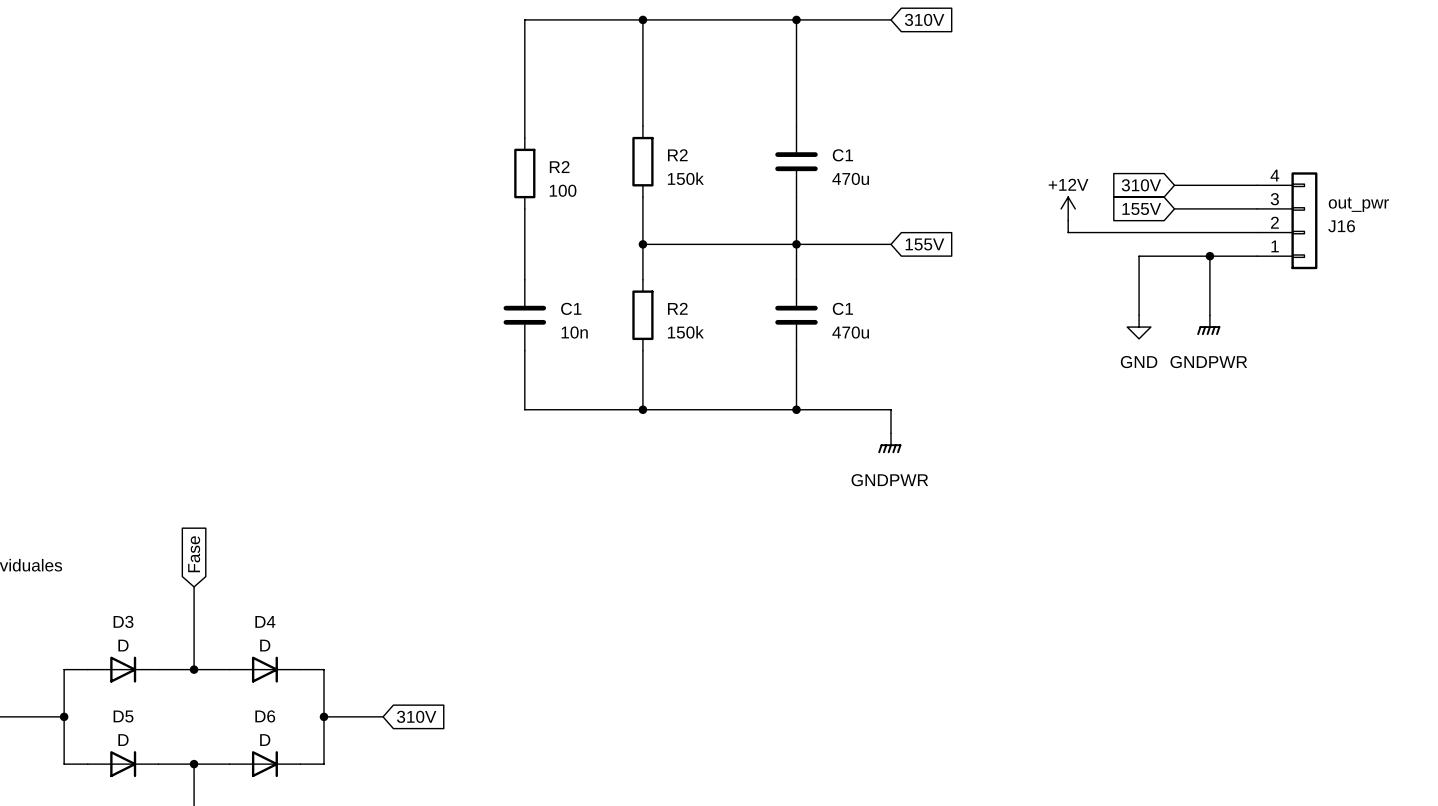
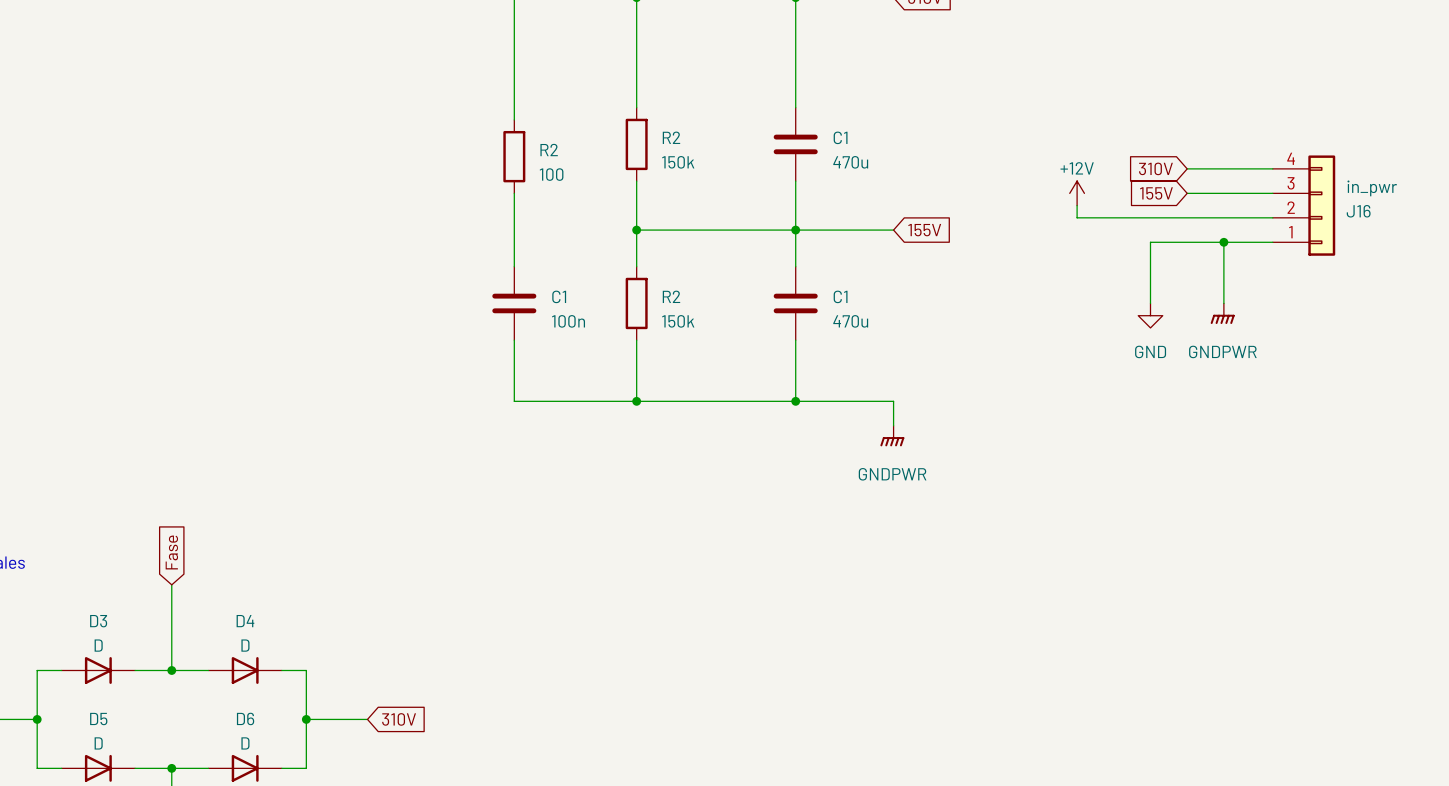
J16 value: out_pwr (1358, 204) -> in_pwr (1372, 188)
C1 value: 10n (574, 332) -> 100n (568, 321)

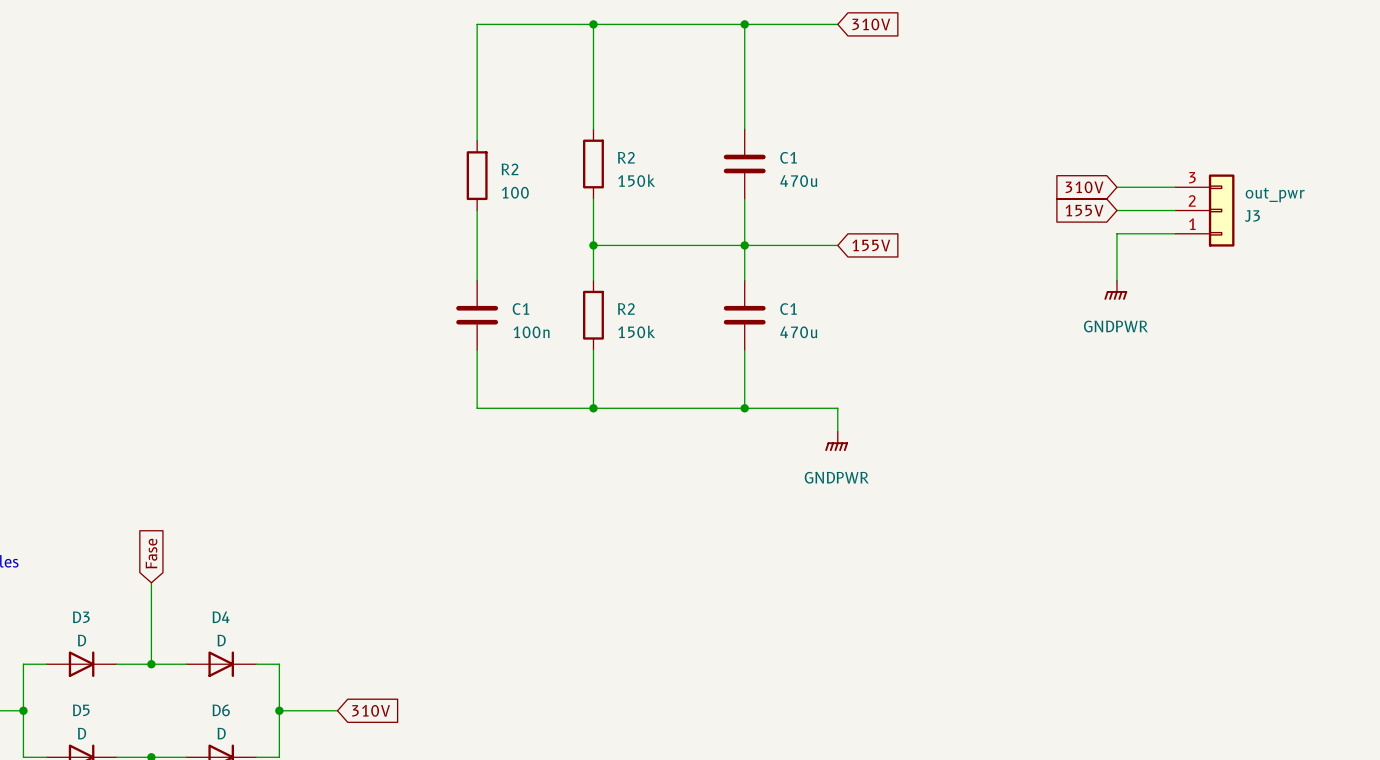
power symbol: +12V (1077, 193) -> none
J3: none -> out_pwr (1204, 210)
wire: (1077, 205) (1077, 217) (1187, 217) -> (1116, 280) (1116, 233)
J16: in_pwr (1304, 205) -> none
wire: (1223, 242) (1223, 303) -> none
junction: (1223, 242) -> none
wire: (1272, 242) (1150, 242) (1150, 303) -> none
power symbol position: GNDPWR (1222, 313) -> GNDPWR (1115, 290)
power symbol: GND (1150, 315) -> none

